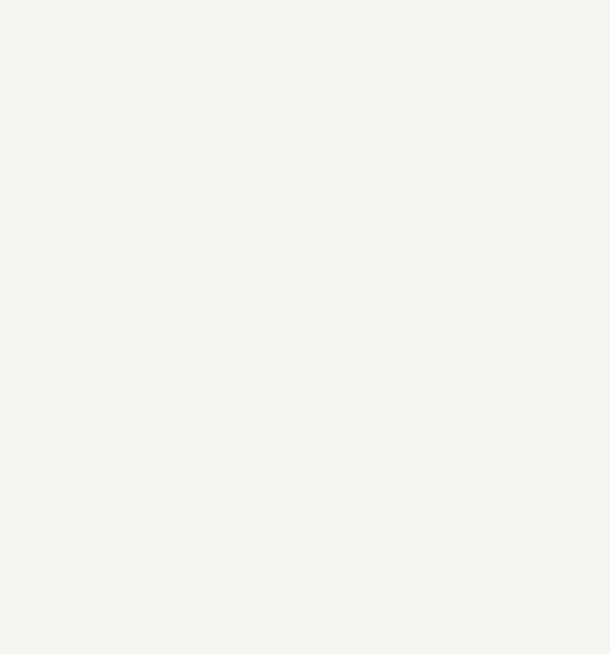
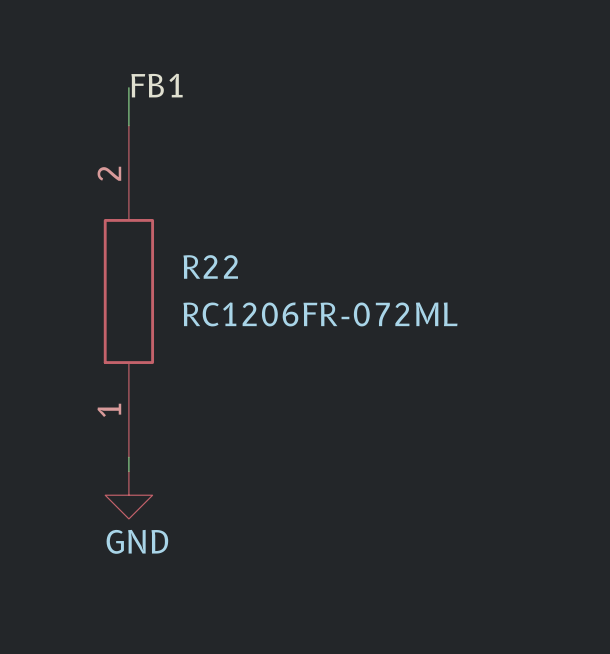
label: none -> FB1 (157, 85)
wire: none -> (128, 87) (128, 125)
R22: none -> RC1206FR-072ML (128, 291)
wire: none -> (128, 457) (128, 471)
power symbol: none -> GND (128, 495)

